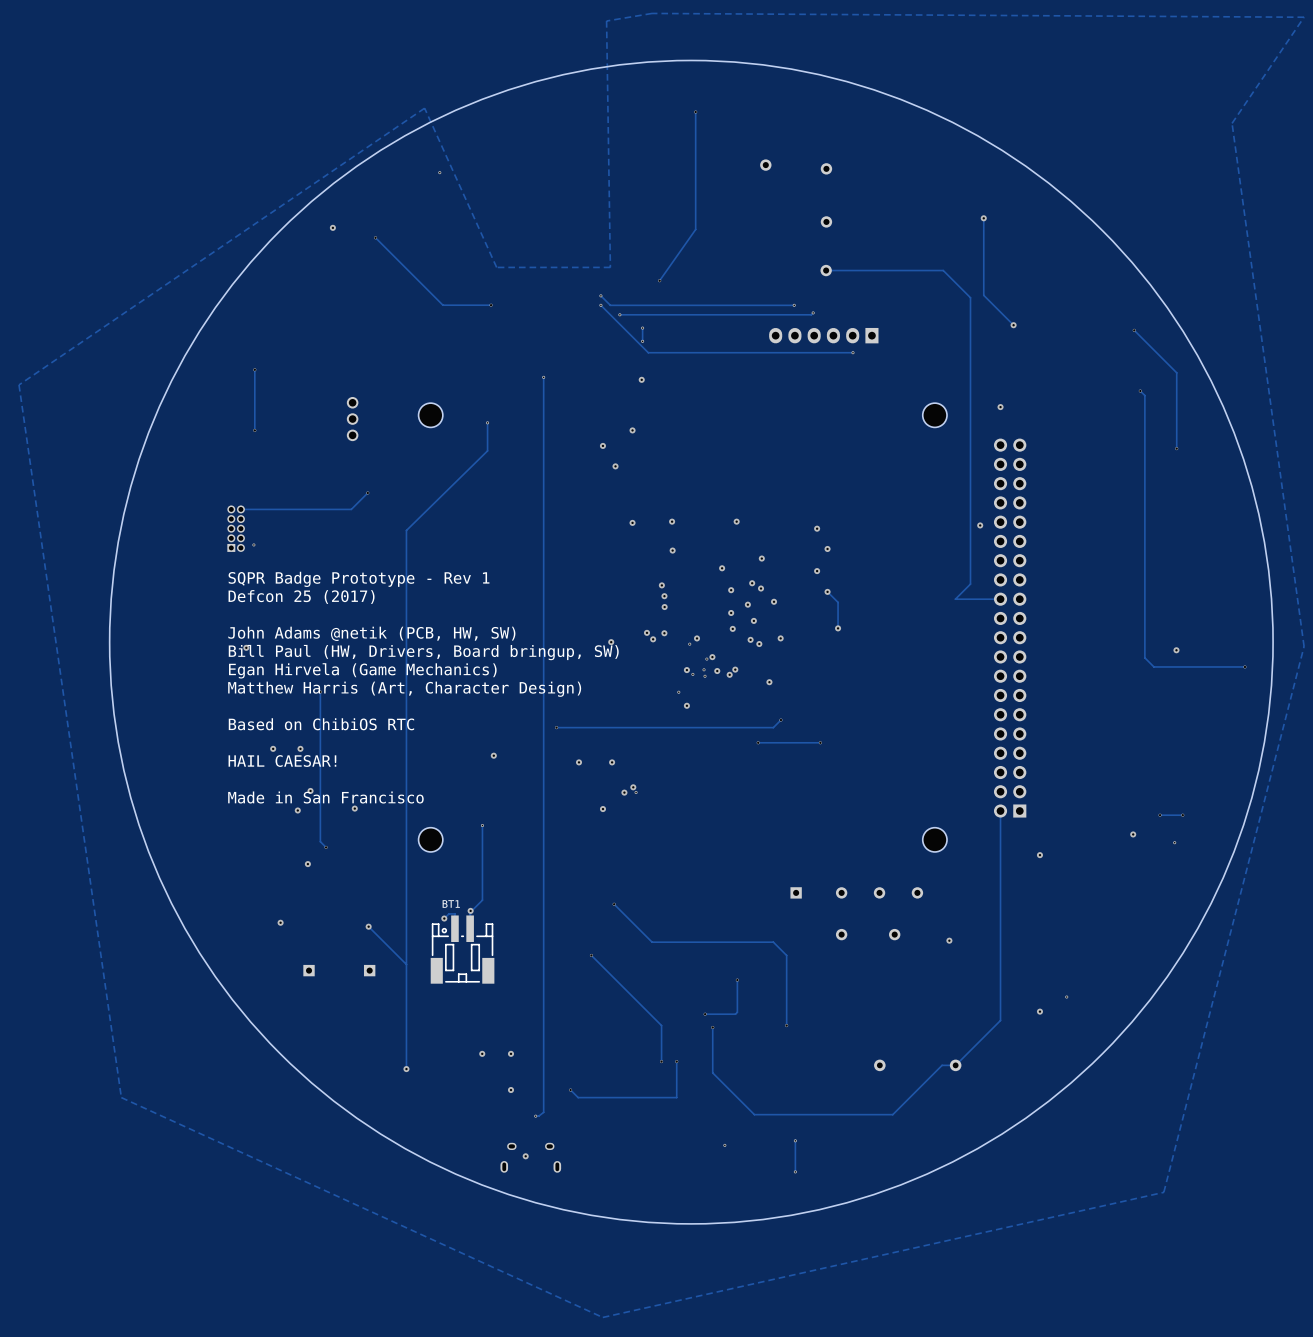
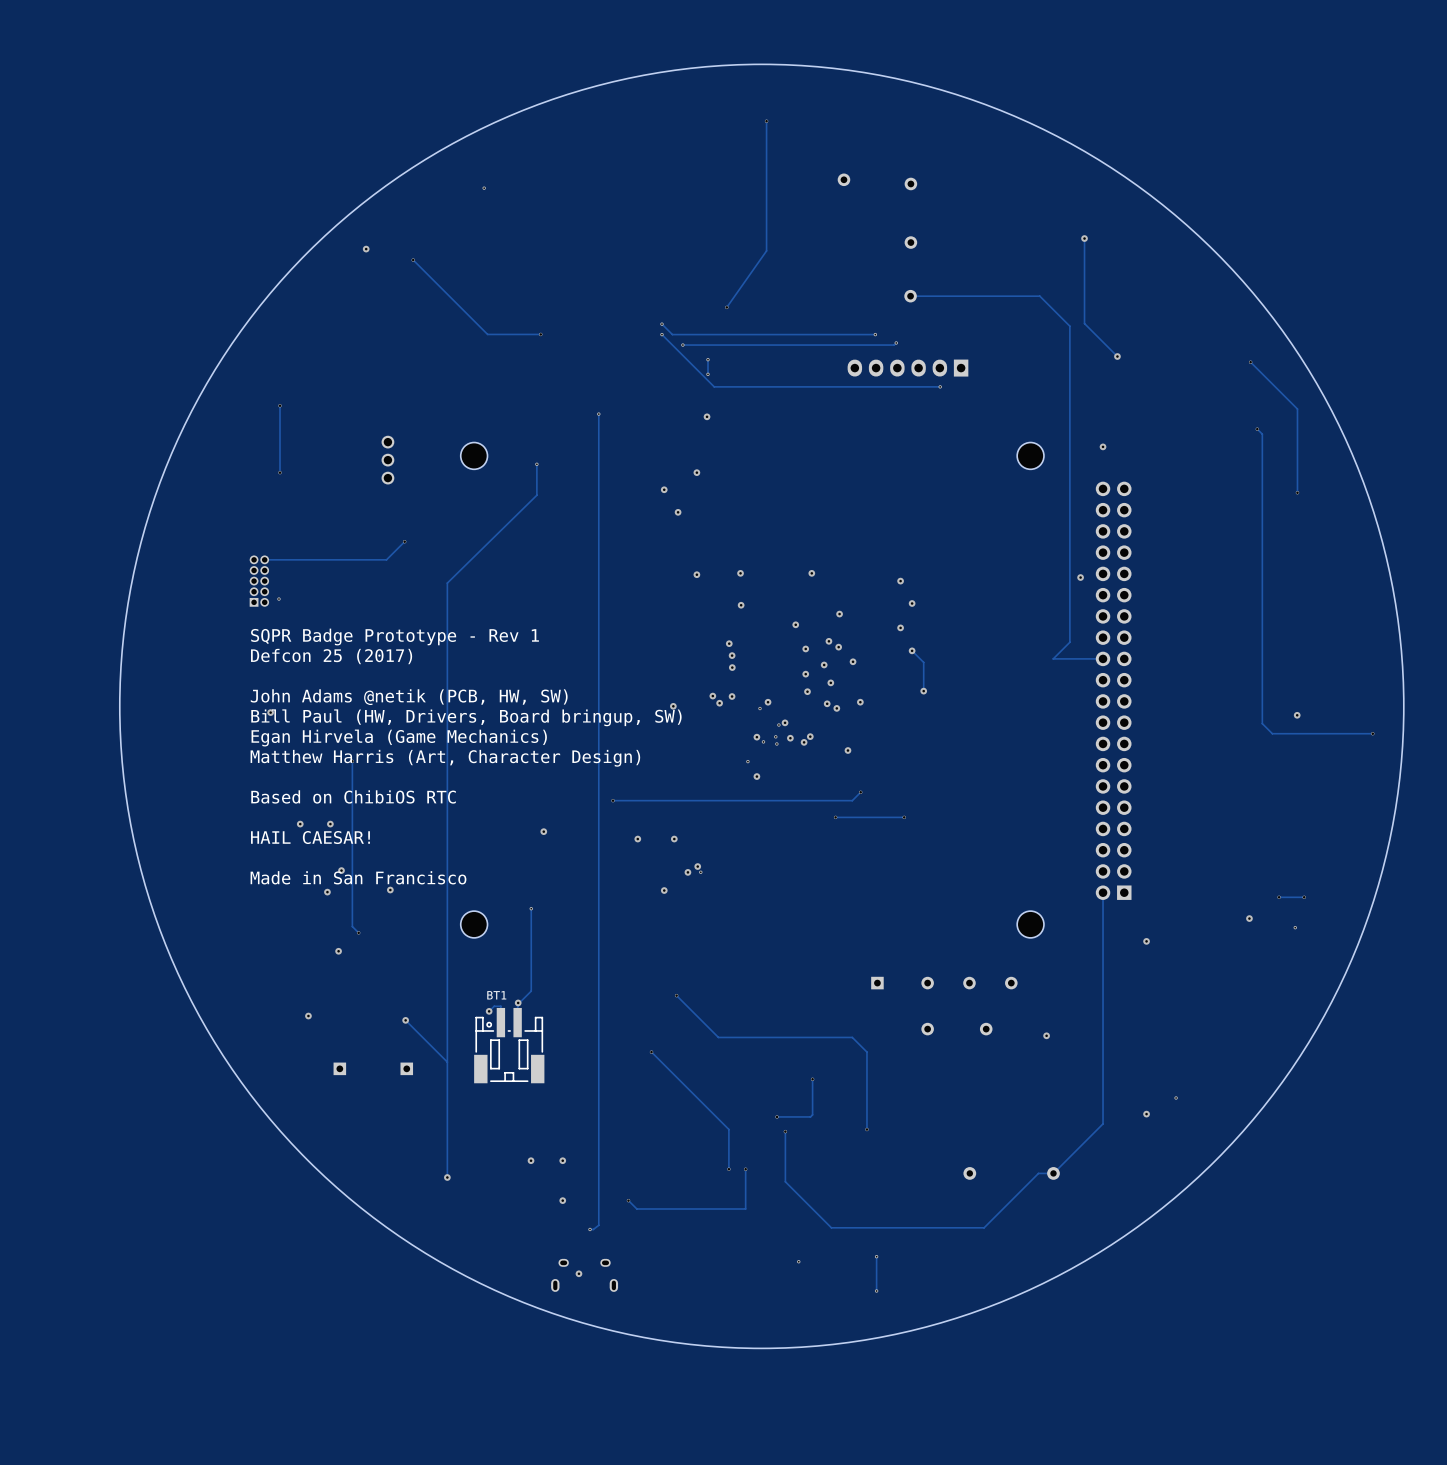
zone outline: (652, 13) (1304, 17) (1232, 123) (1304, 646) (1163, 1192) (602, 1317) (121, 1097) (19, 384) (424, 108) (496, 267) (610, 267) (606, 21) (652, 13) -> none

